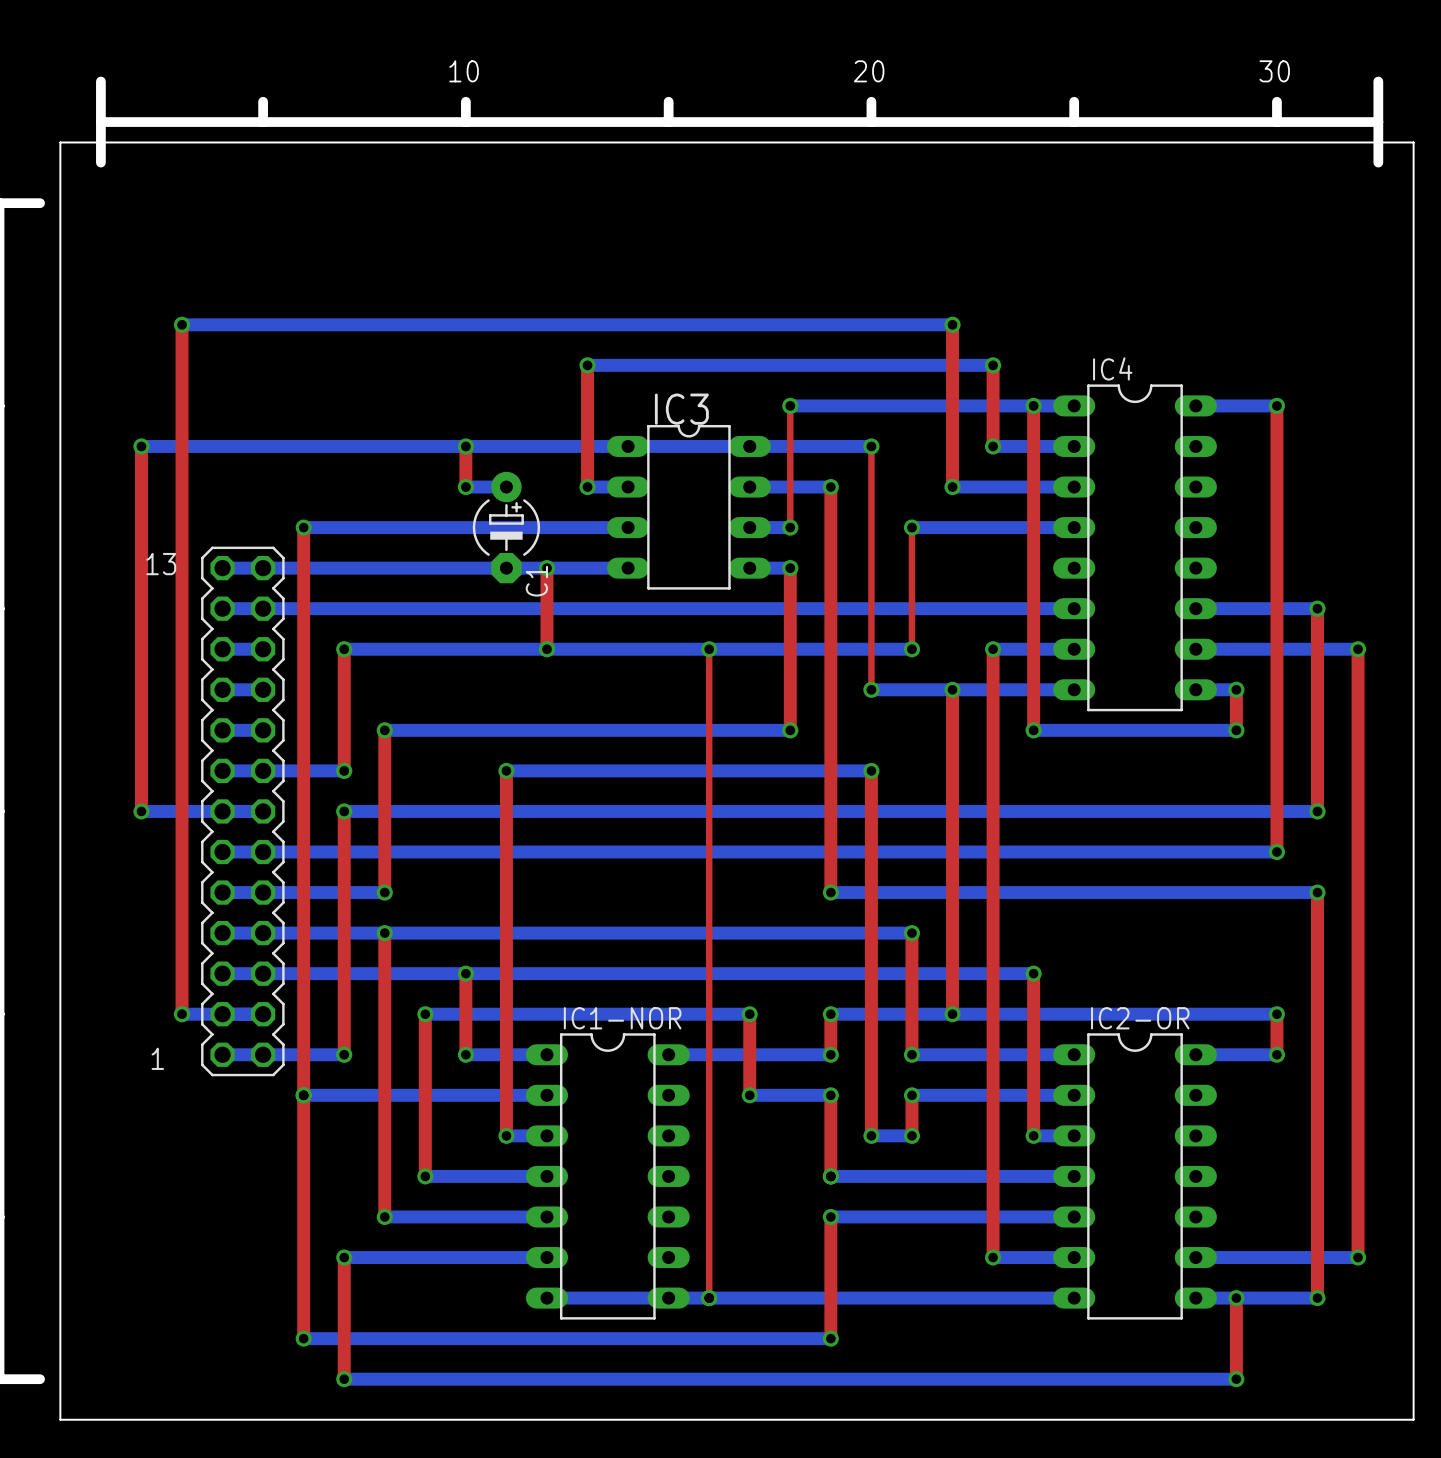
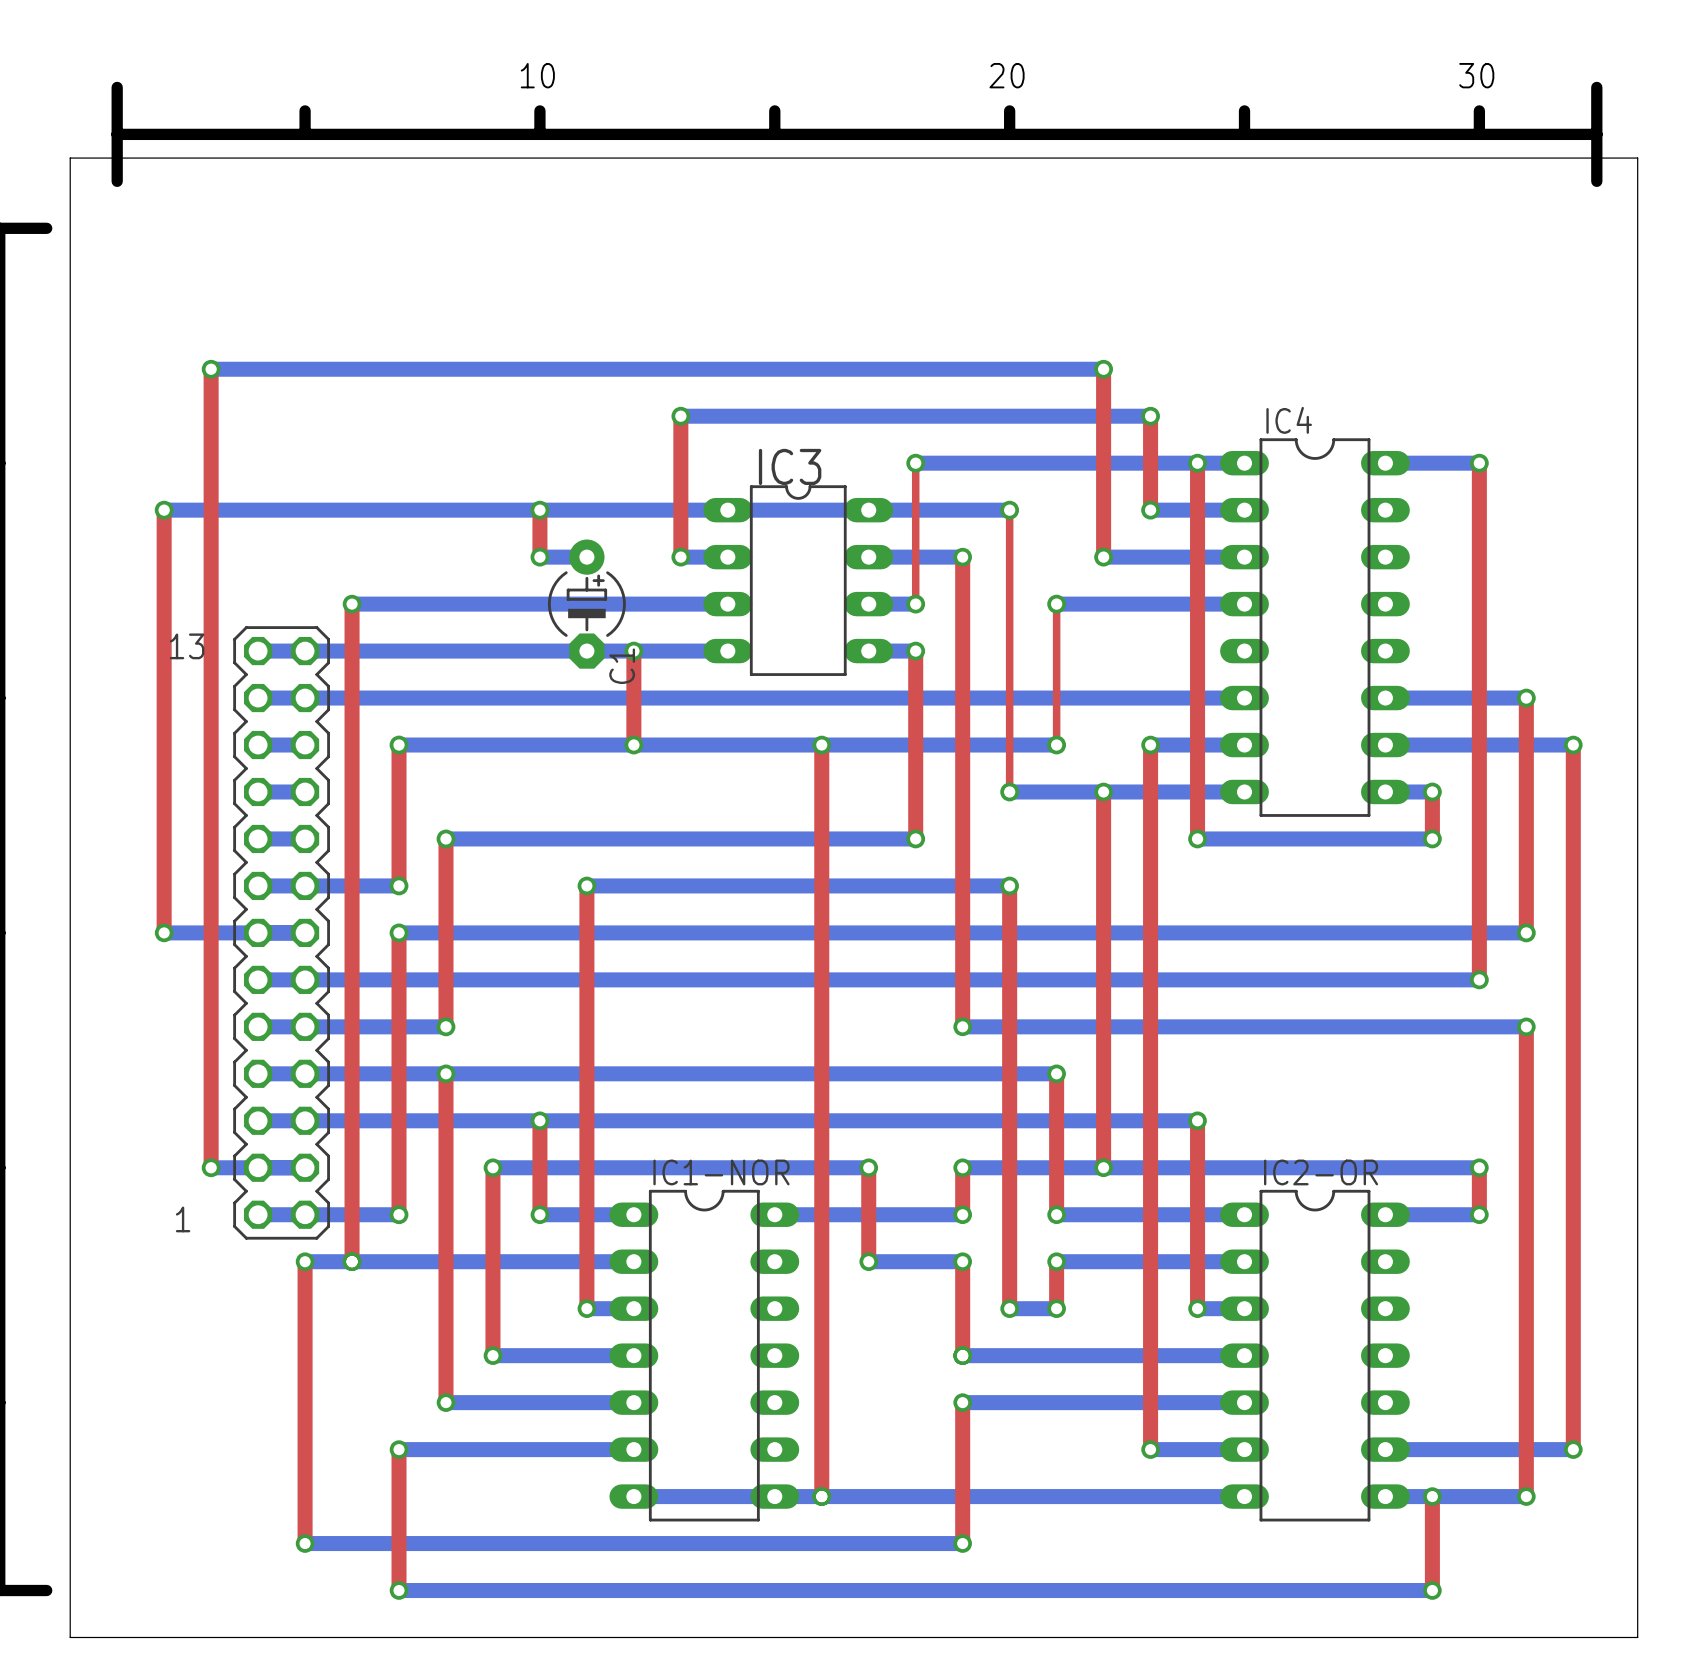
top track width: thin (709, 649) (709, 1298) -> thick (821, 745) (821, 1496)
bottom track: none -> (305, 1261) (352, 1261)
via: none -> (305, 1261)
top track: (303, 1095) (303, 1338) -> (305, 1261) (305, 1543)
bottom track: none -> (305, 1543) (352, 1543)
via position: (303, 1338) -> (305, 1543)

